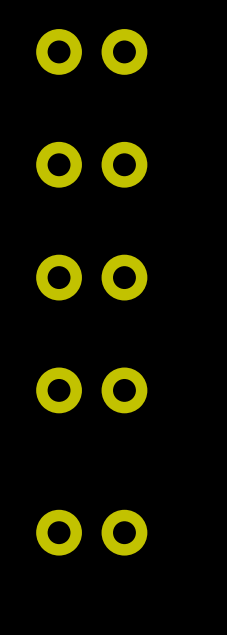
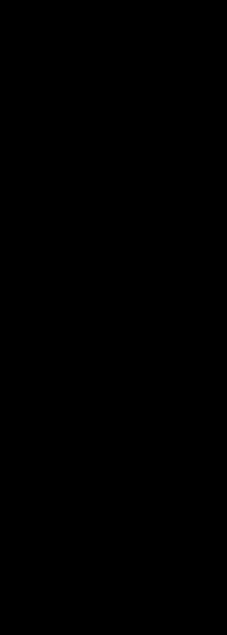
part: (91, 51) -> none
part: (91, 164) -> none
part: (91, 277) -> none
part: (91, 390) -> none
part: (91, 532) -> none

